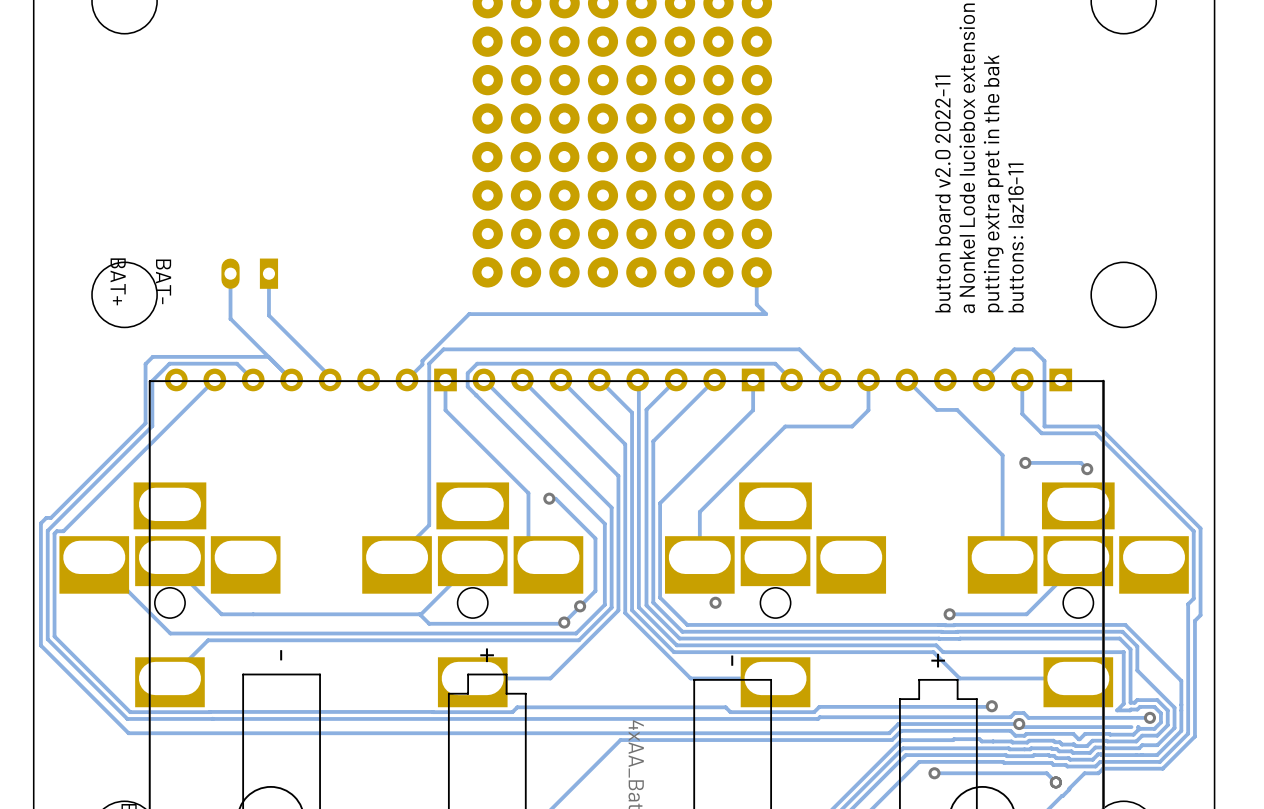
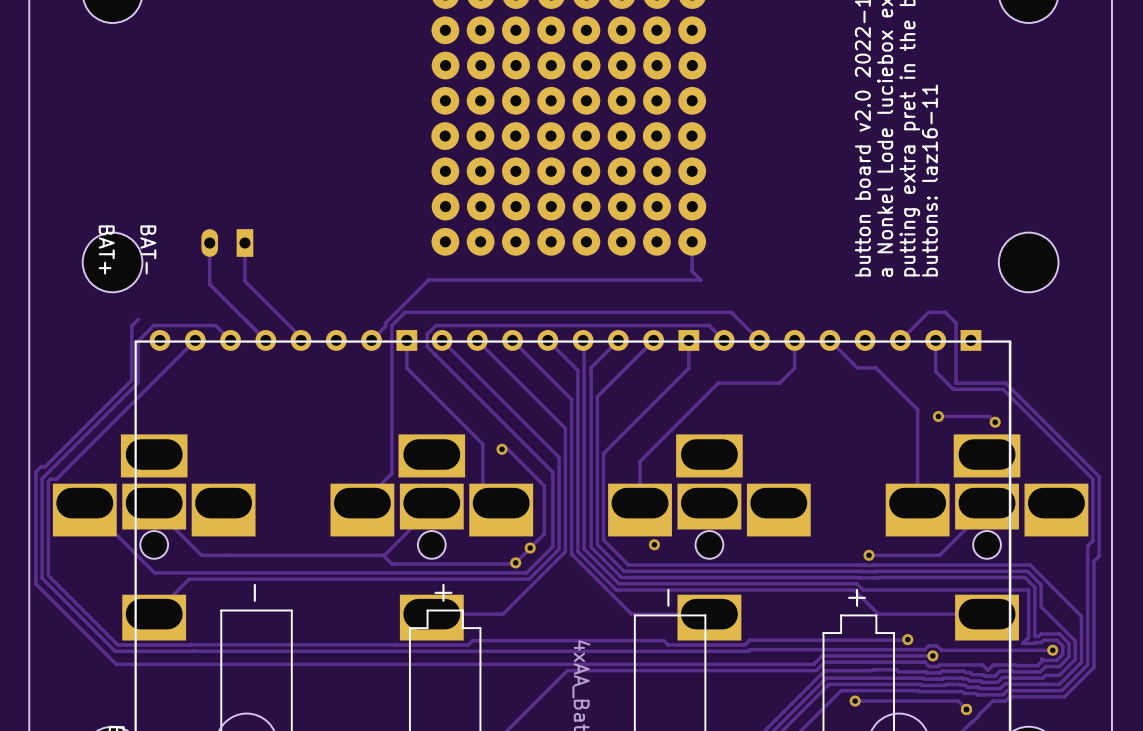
track: (268, 356) (152, 356) -> none
track: (1131, 727) (1022, 727) -> none

